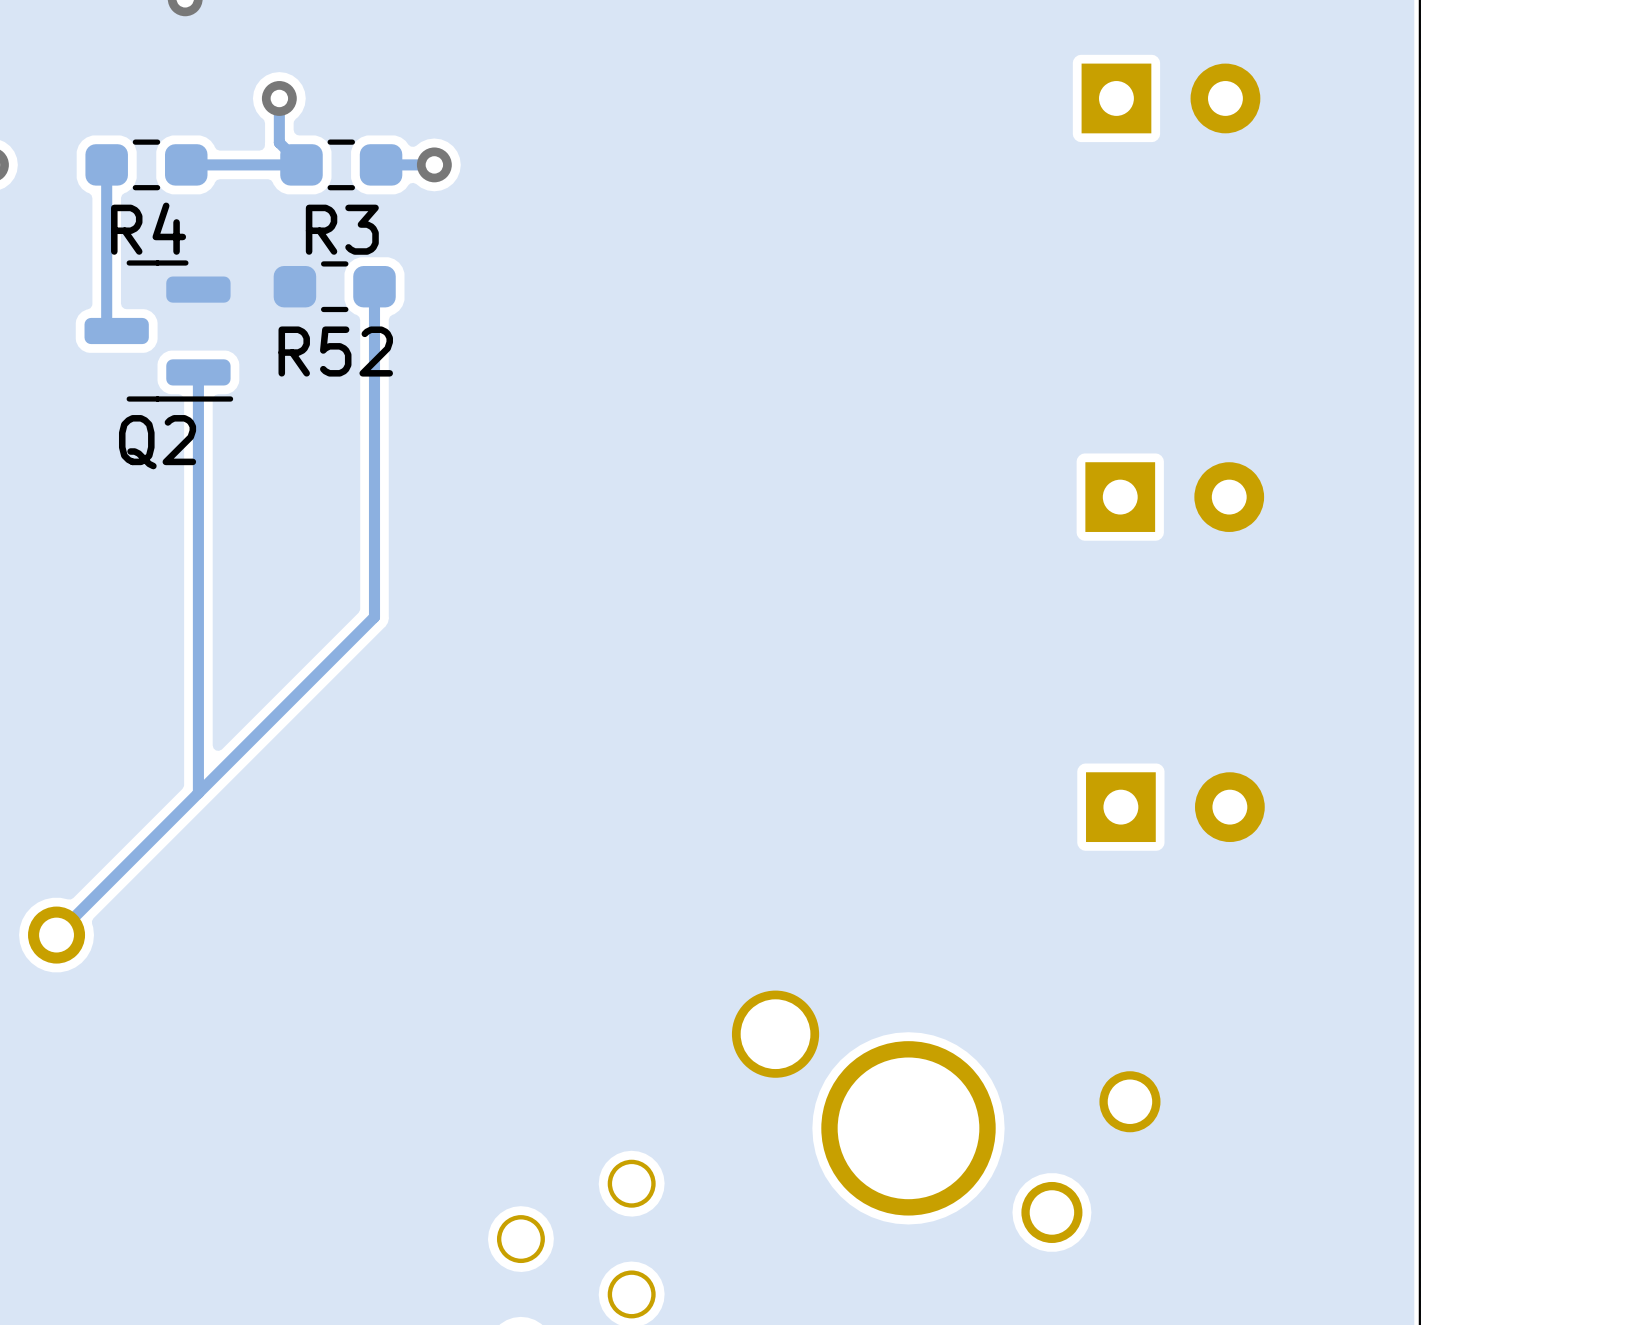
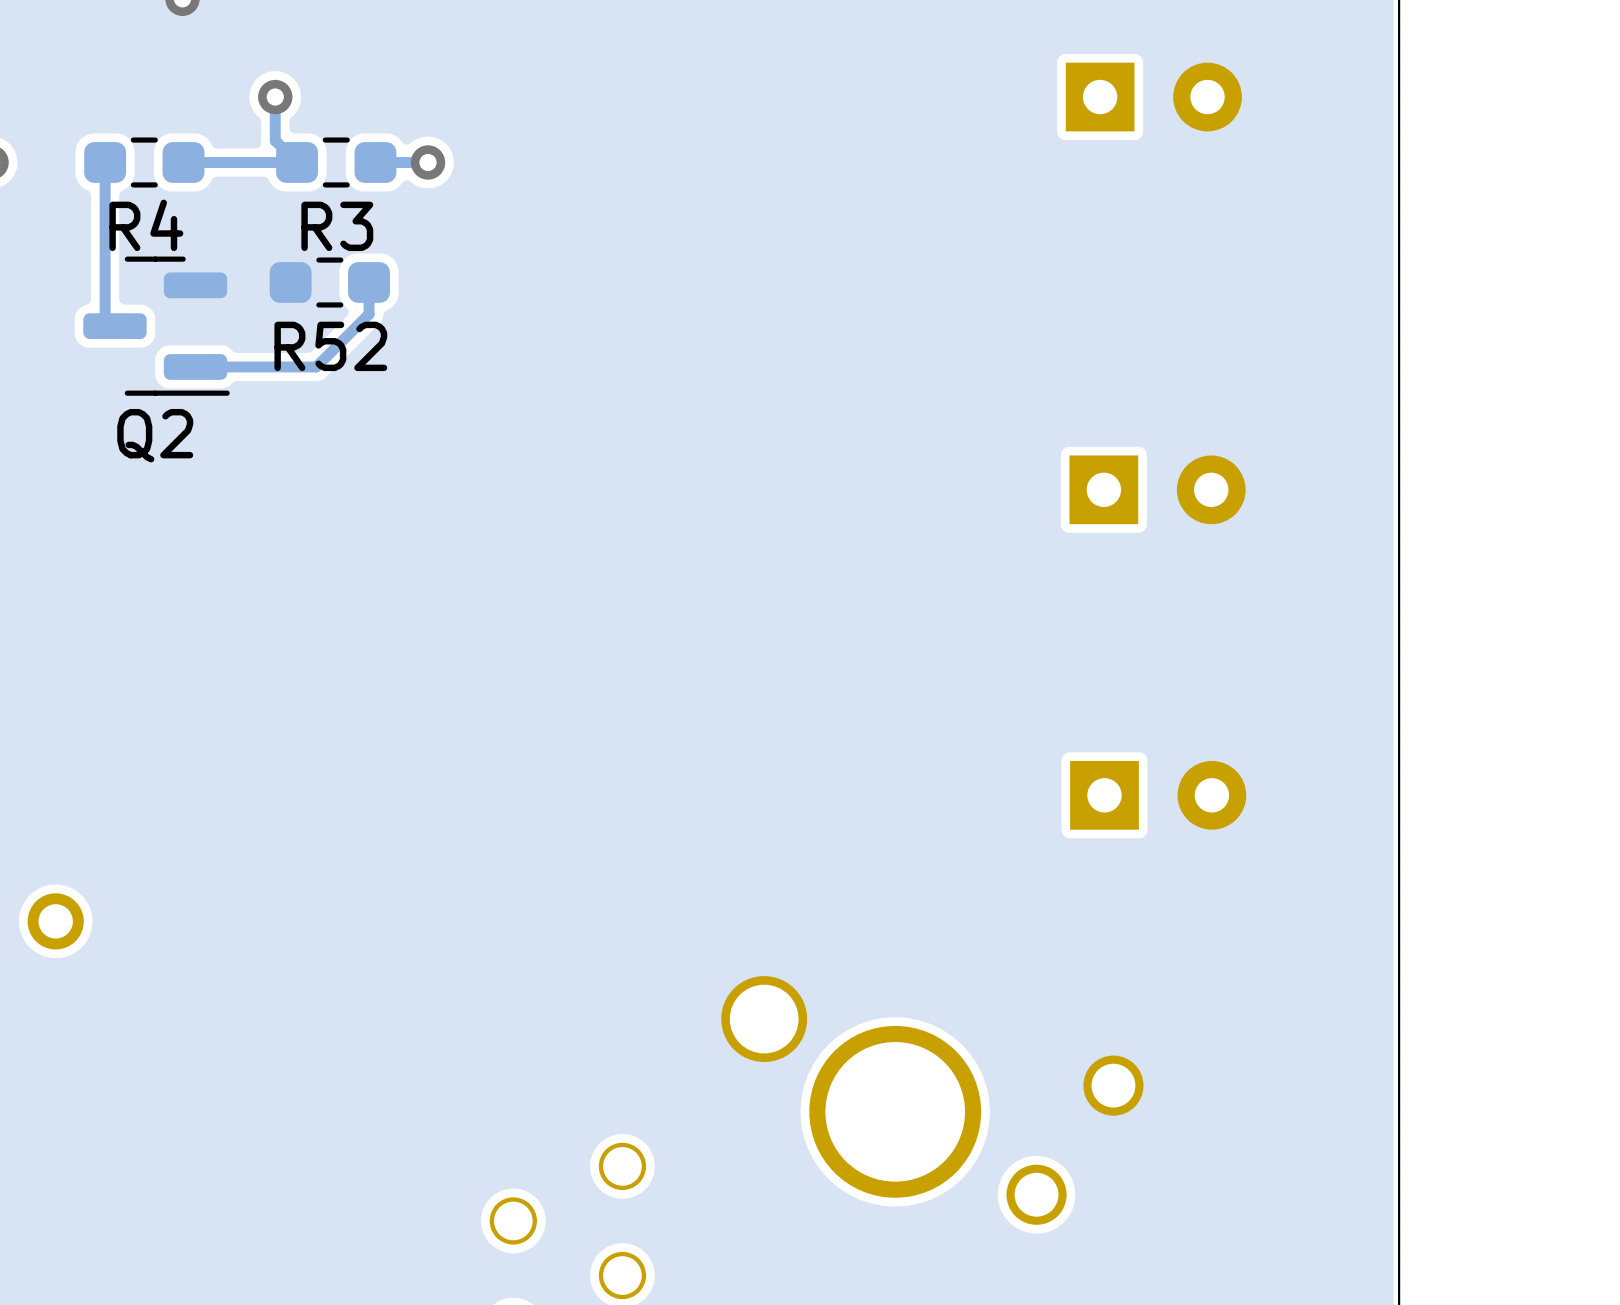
track: (374, 318) (374, 617) (56, 935) -> none
track: (198, 372) (198, 792) -> (195, 366) (316, 366) (369, 314)

